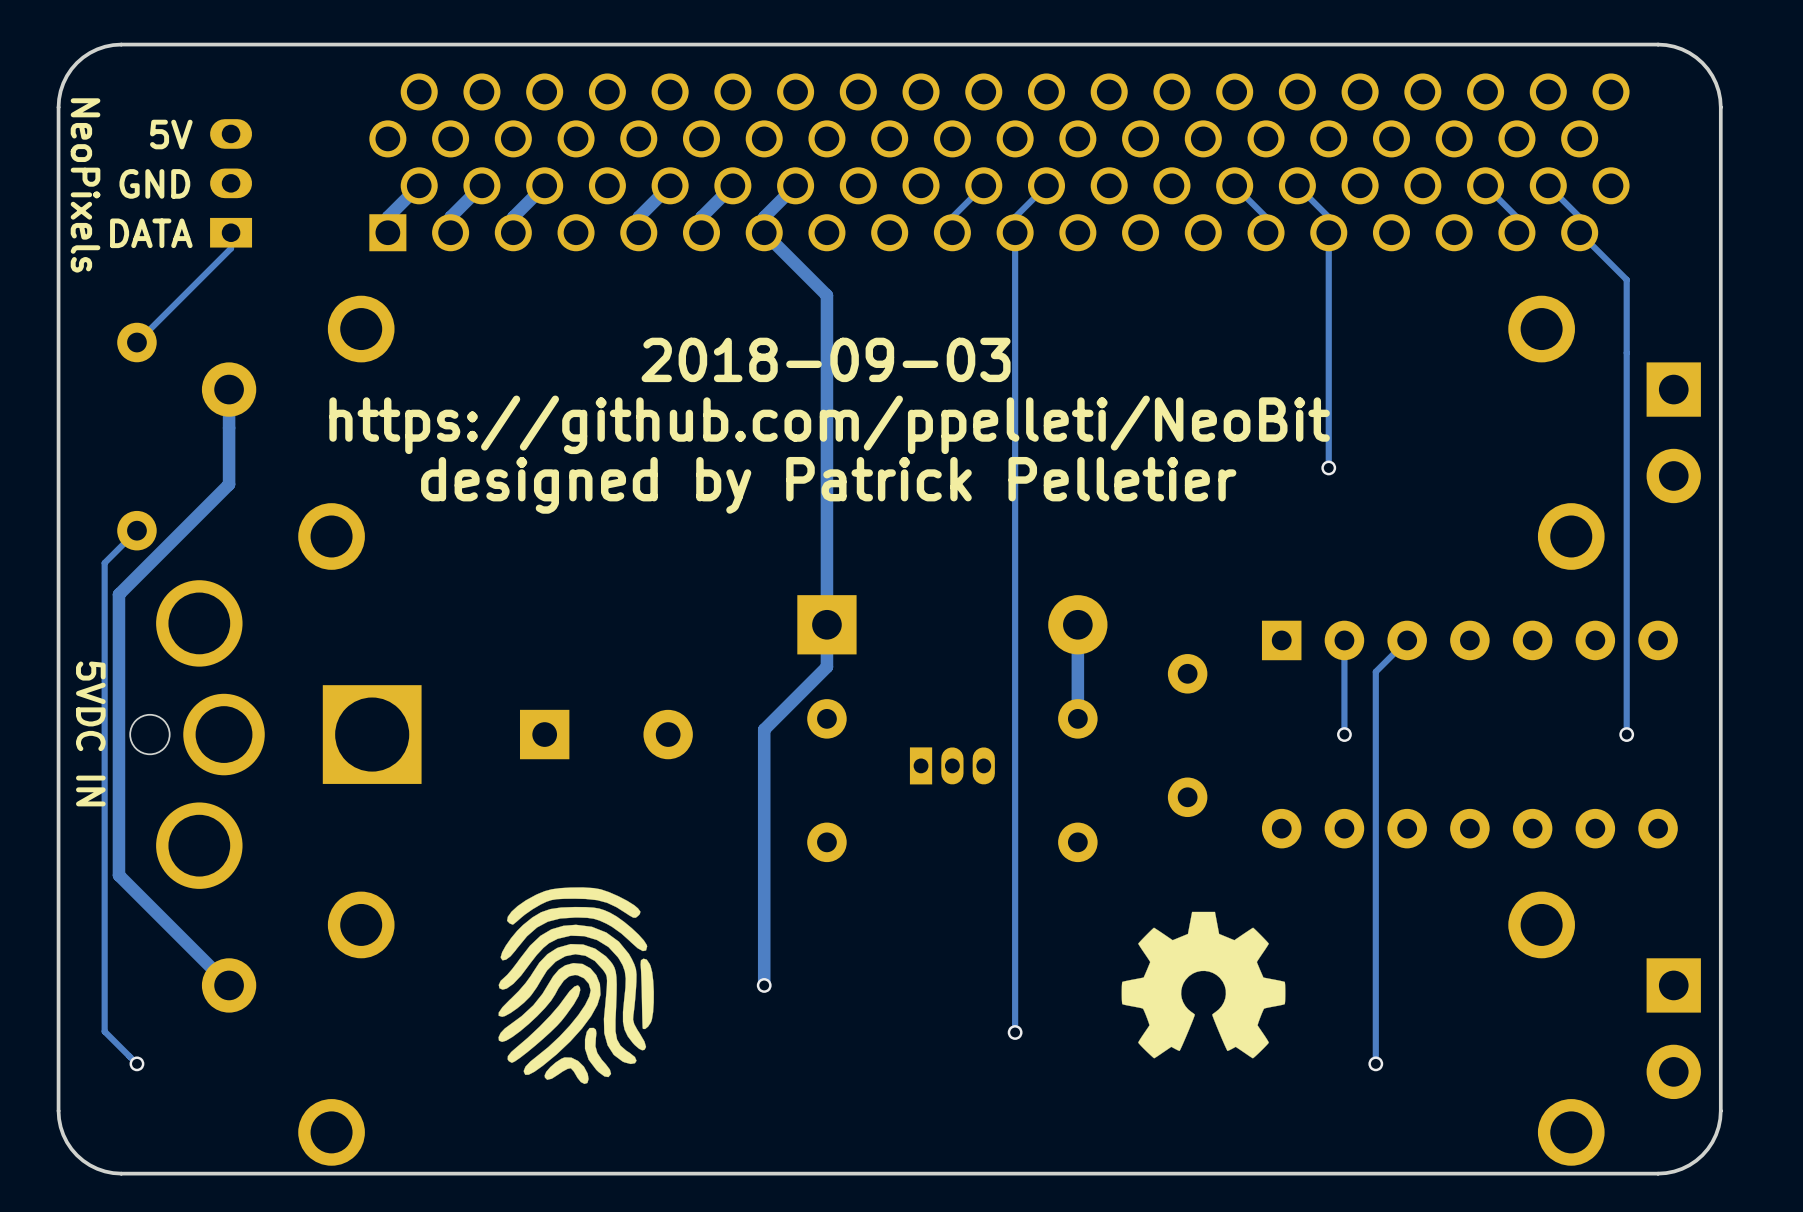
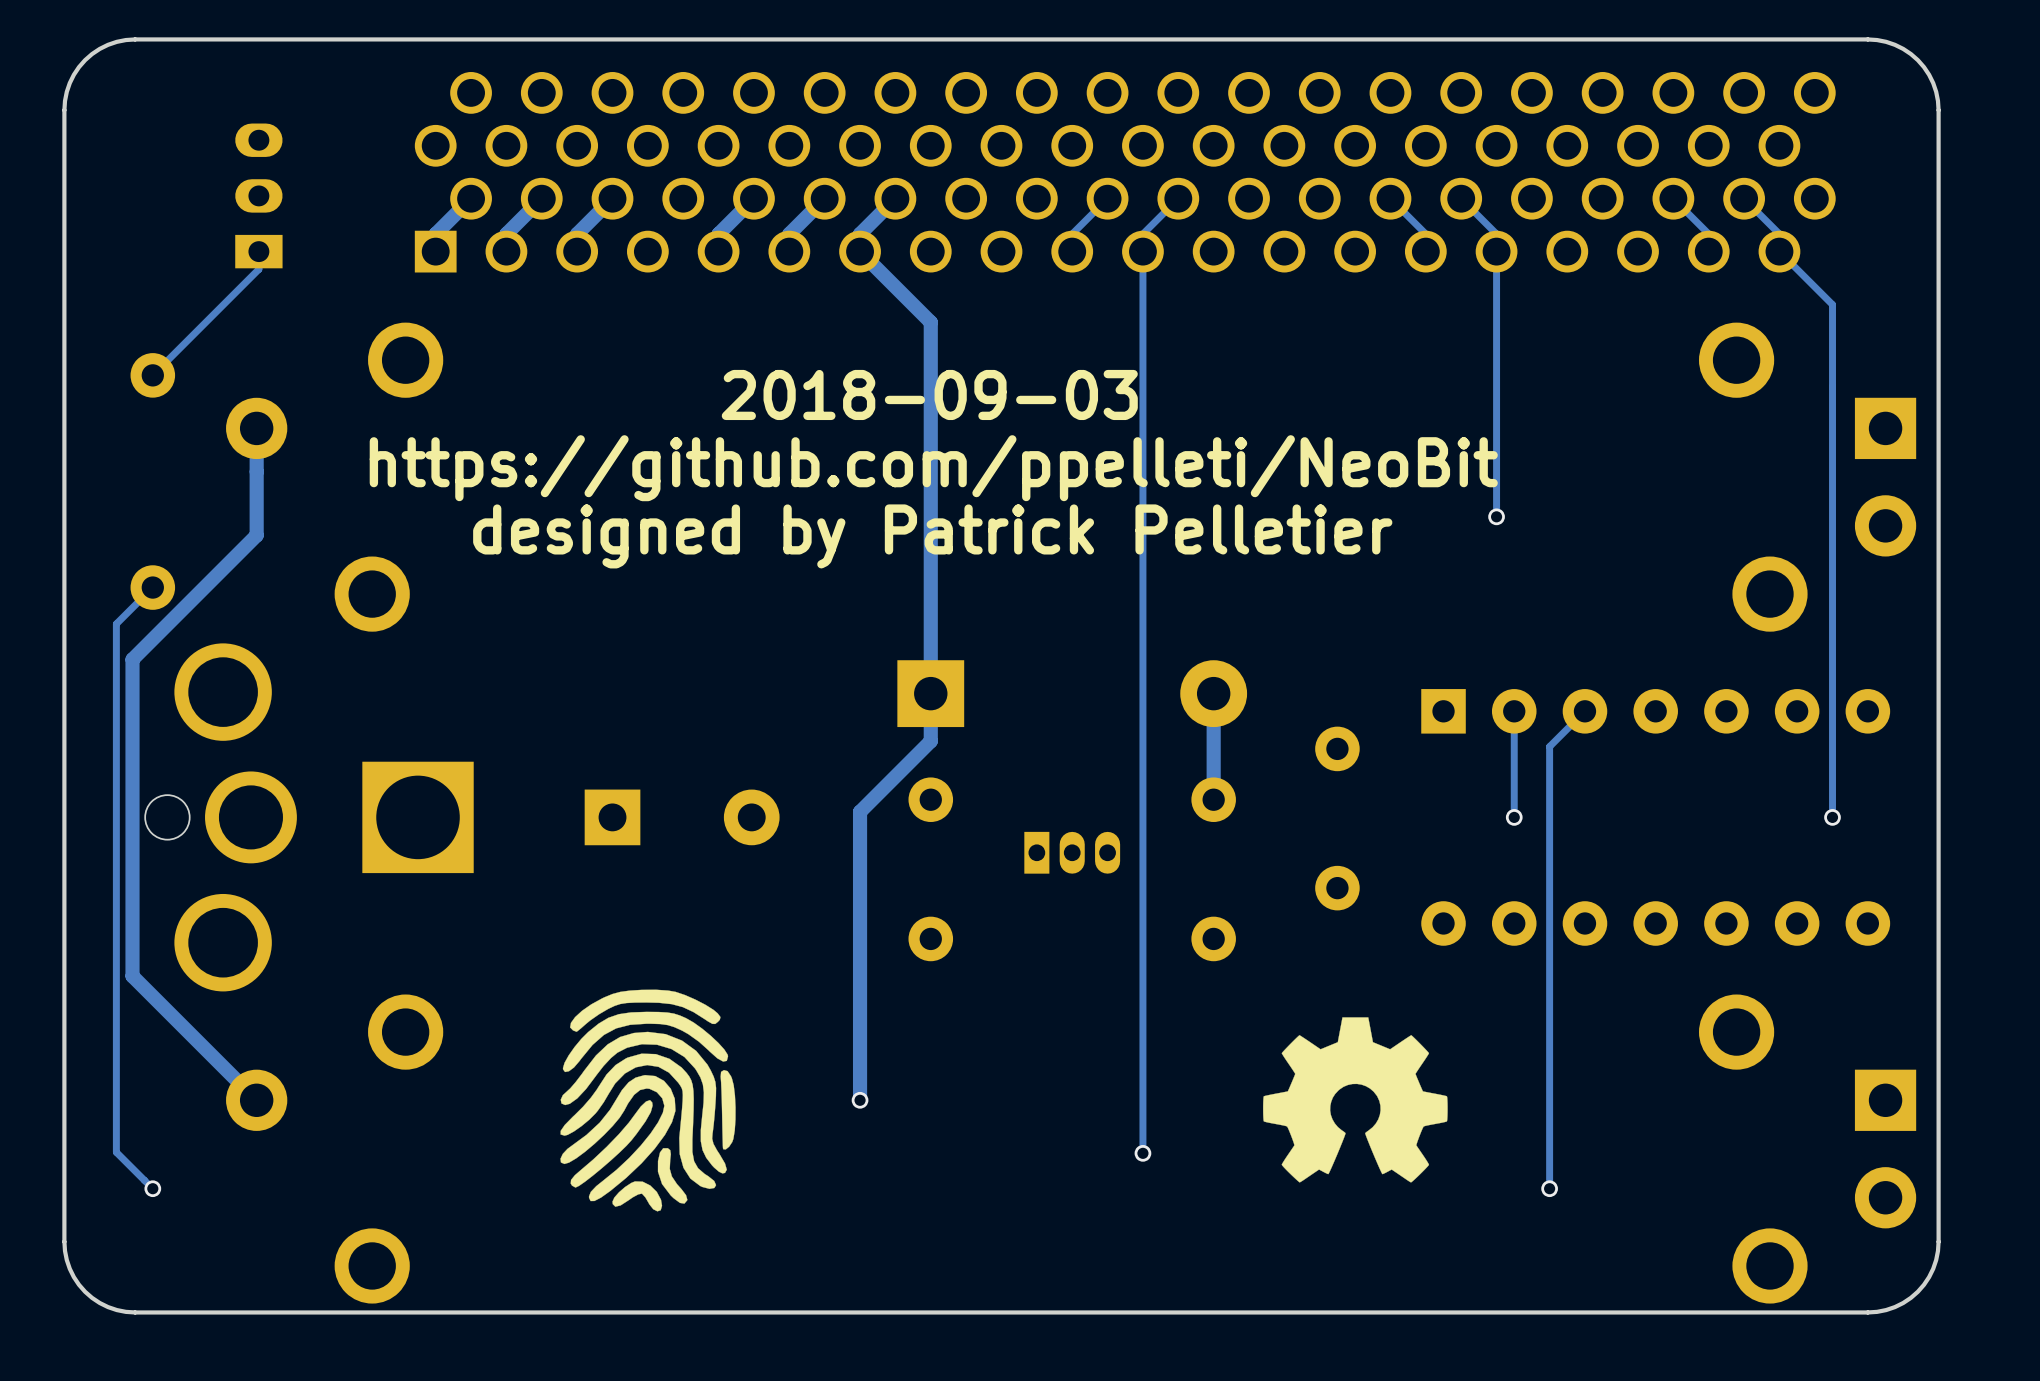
text: 5V (171, 134) -> none
text: GND (154, 183) -> none
text: NeoPixels (85, 185) -> none
text: DATA (151, 233) -> none
text: 5VDC IN (90, 733) -> none

